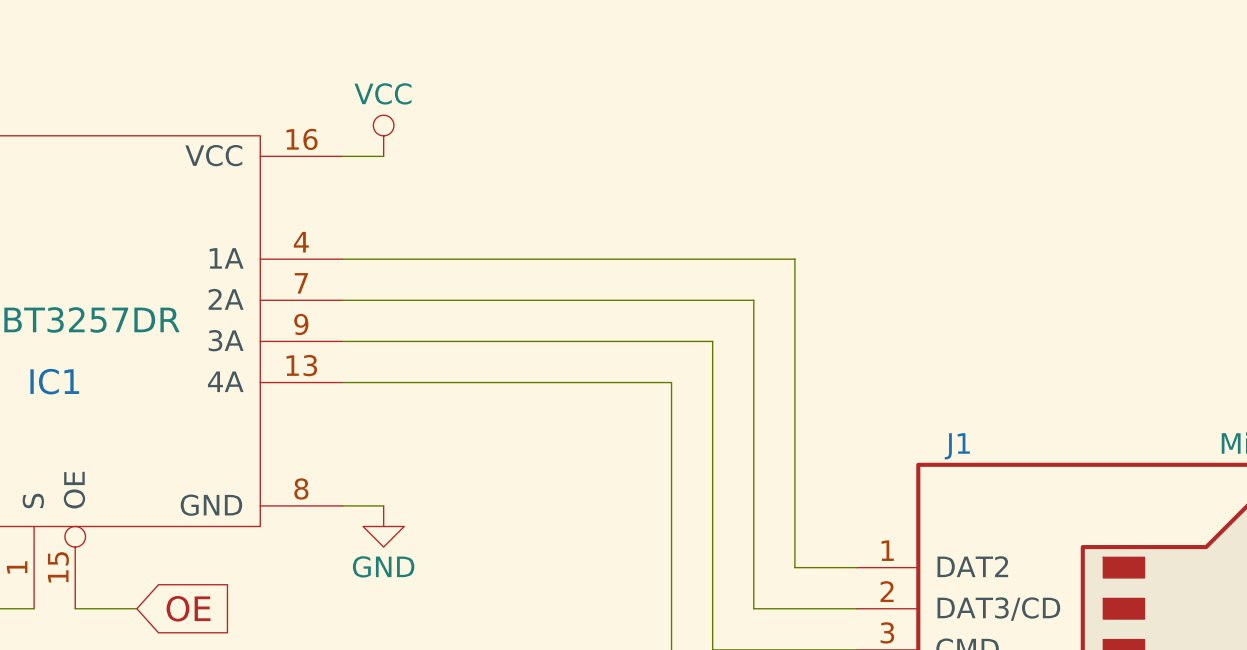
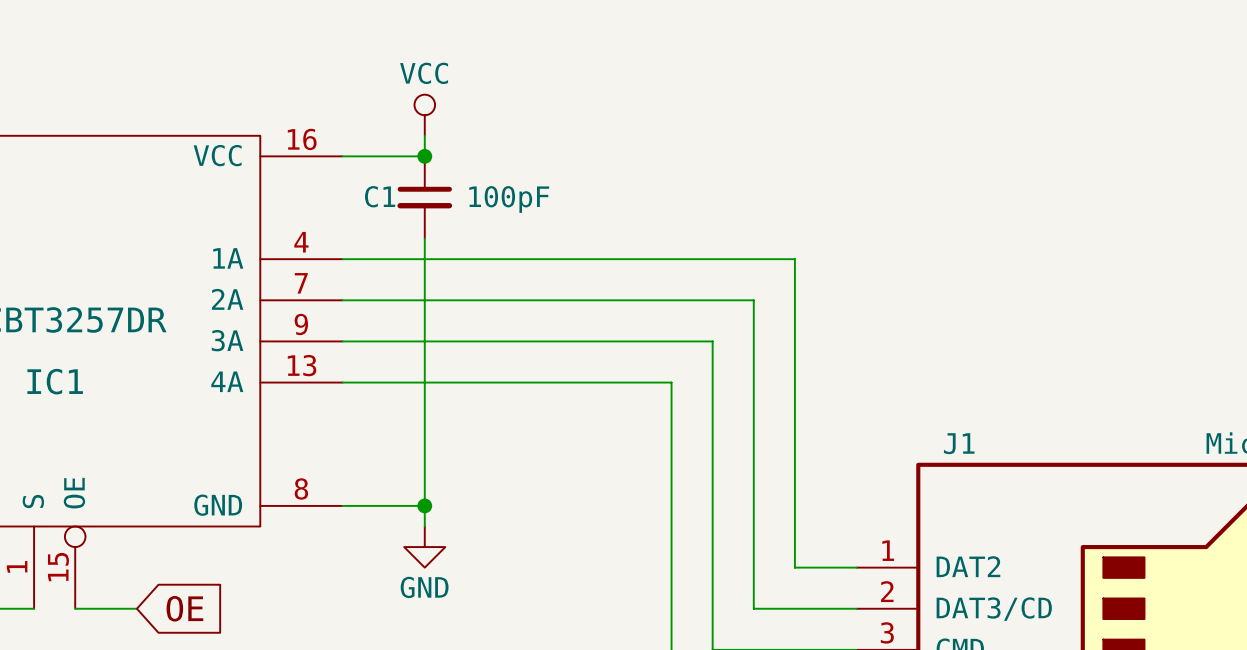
power symbol position: VCC (383, 135) -> VCC (424, 115)
wire: none -> (424, 135) (424, 156) (383, 156)
junction: none -> (424, 156)
C1: none -> 100pF (424, 197)
wire: none -> (424, 238) (424, 526)
wire: none -> (383, 505) (424, 505)
junction: none -> (424, 505)
power symbol position: GND (383, 526) -> GND (424, 547)

